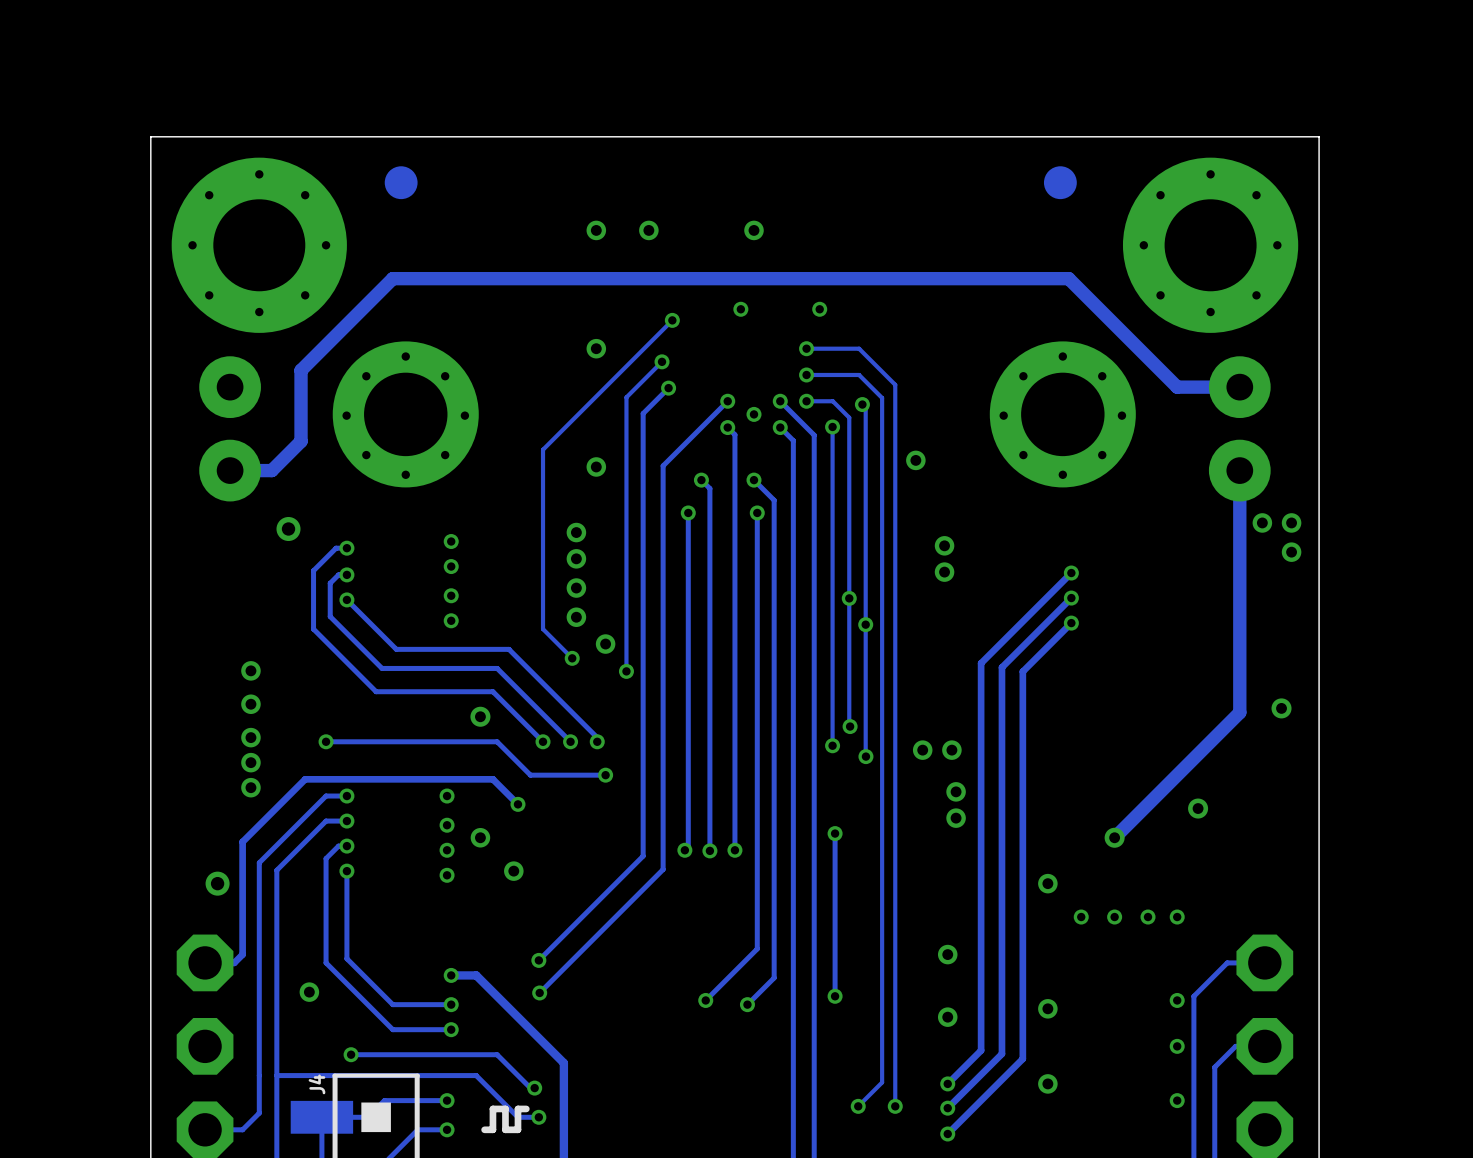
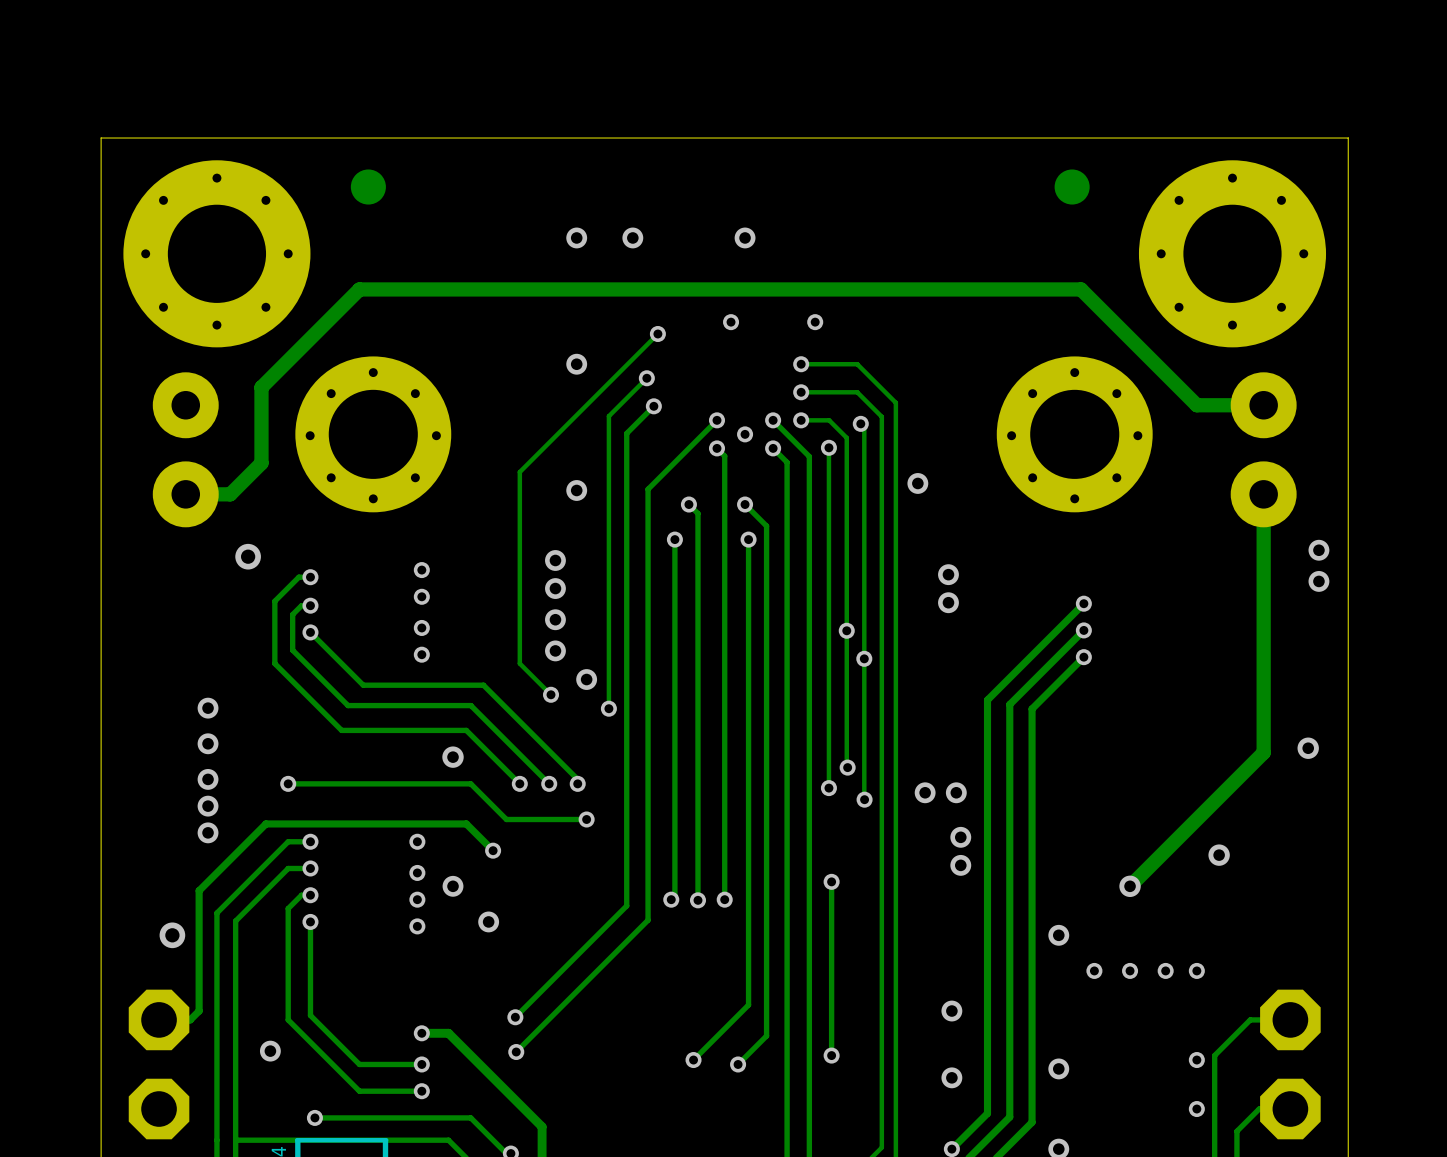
via: (1262, 522) -> none

